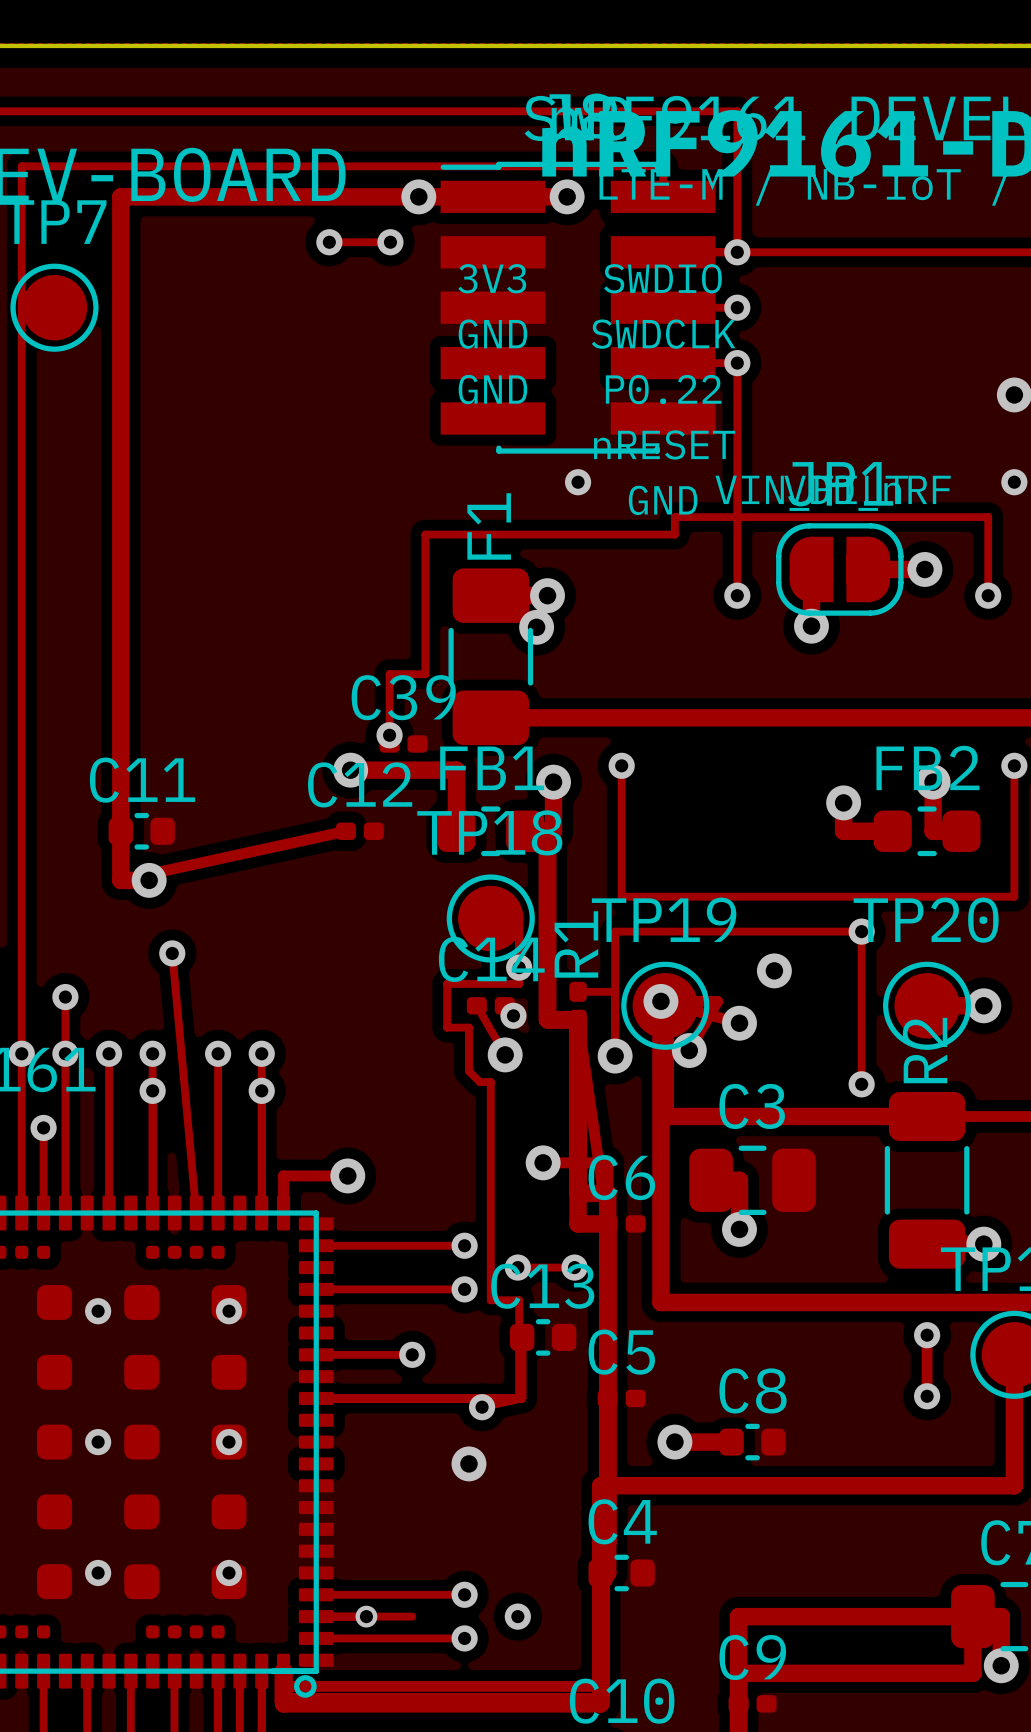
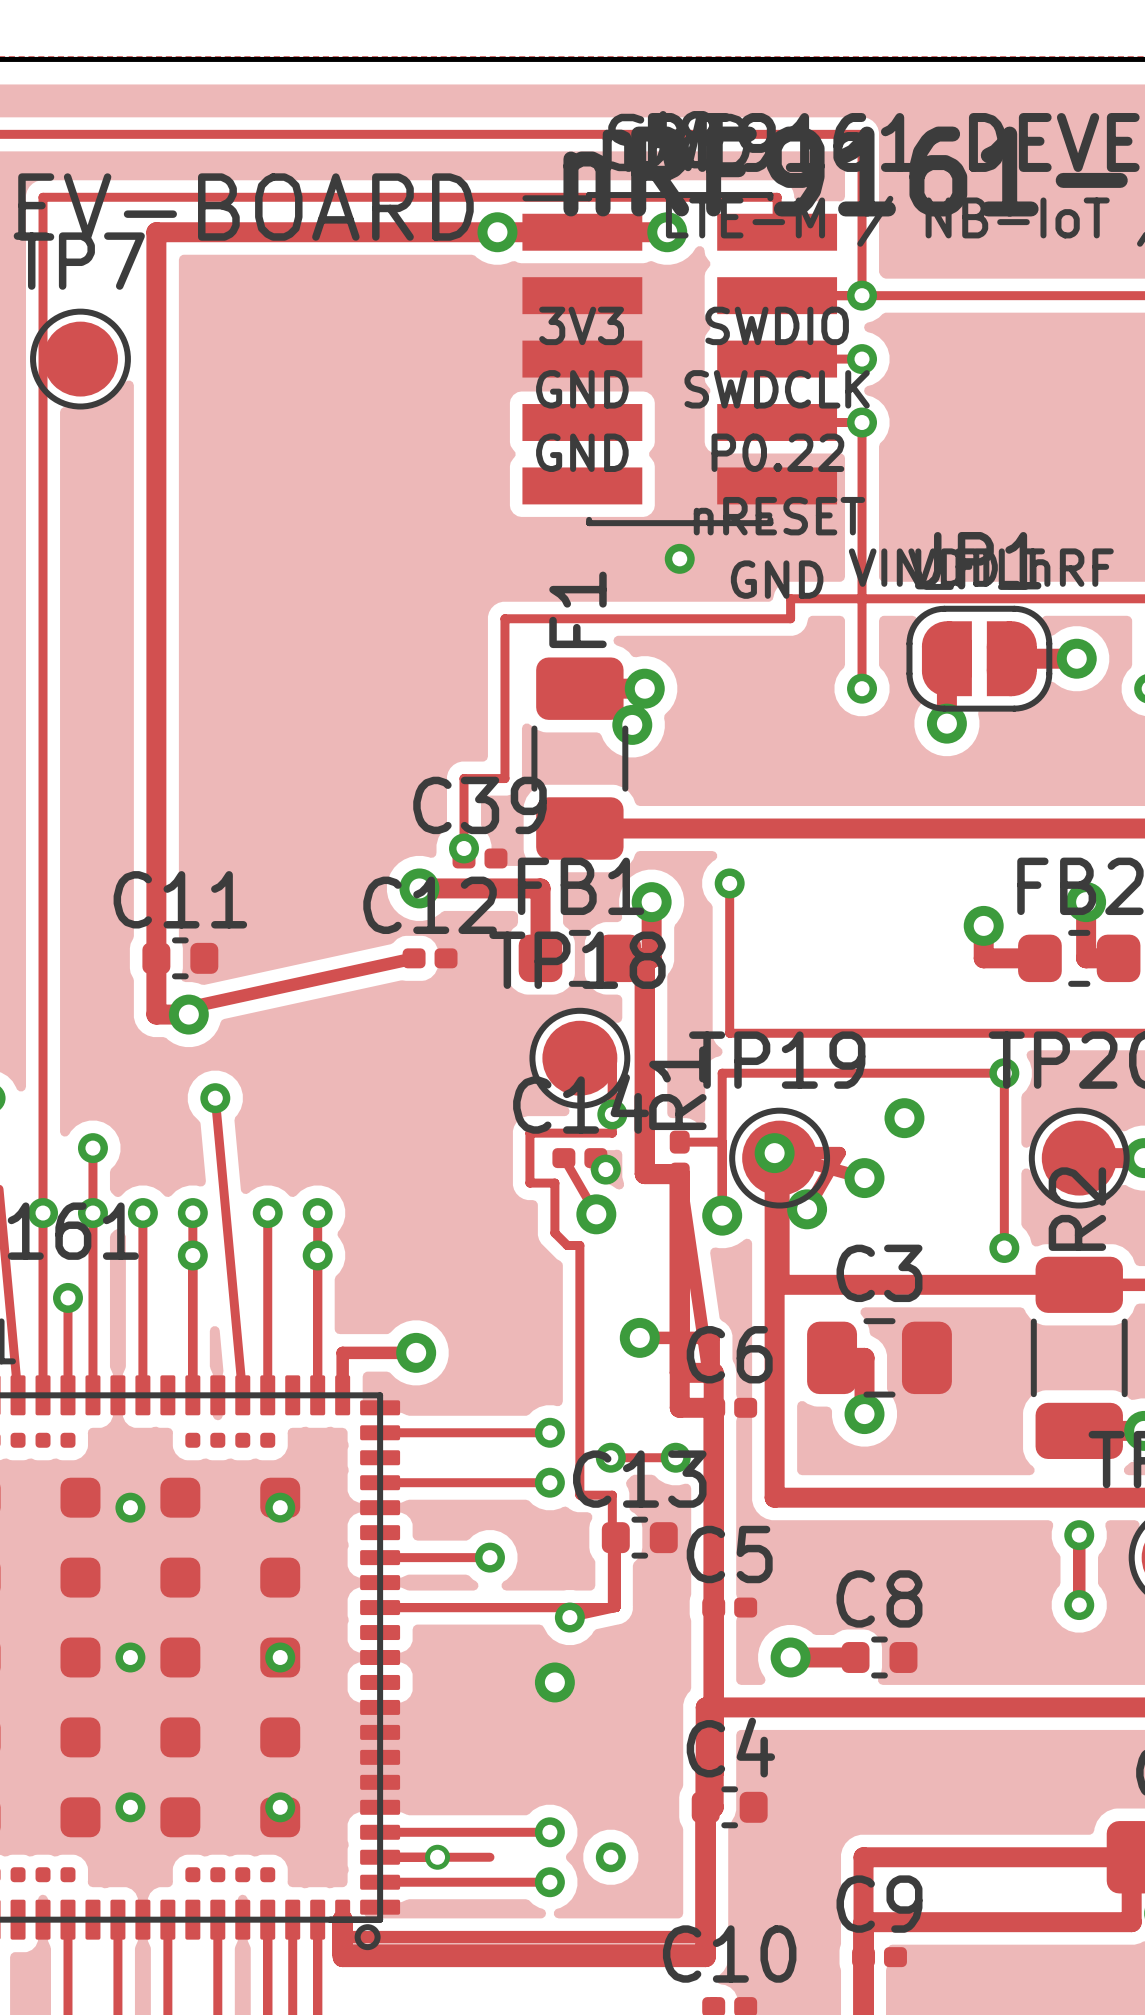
track: (329, 242) (390, 242) -> none
via: (329, 242) -> none
via: (390, 242) -> none

